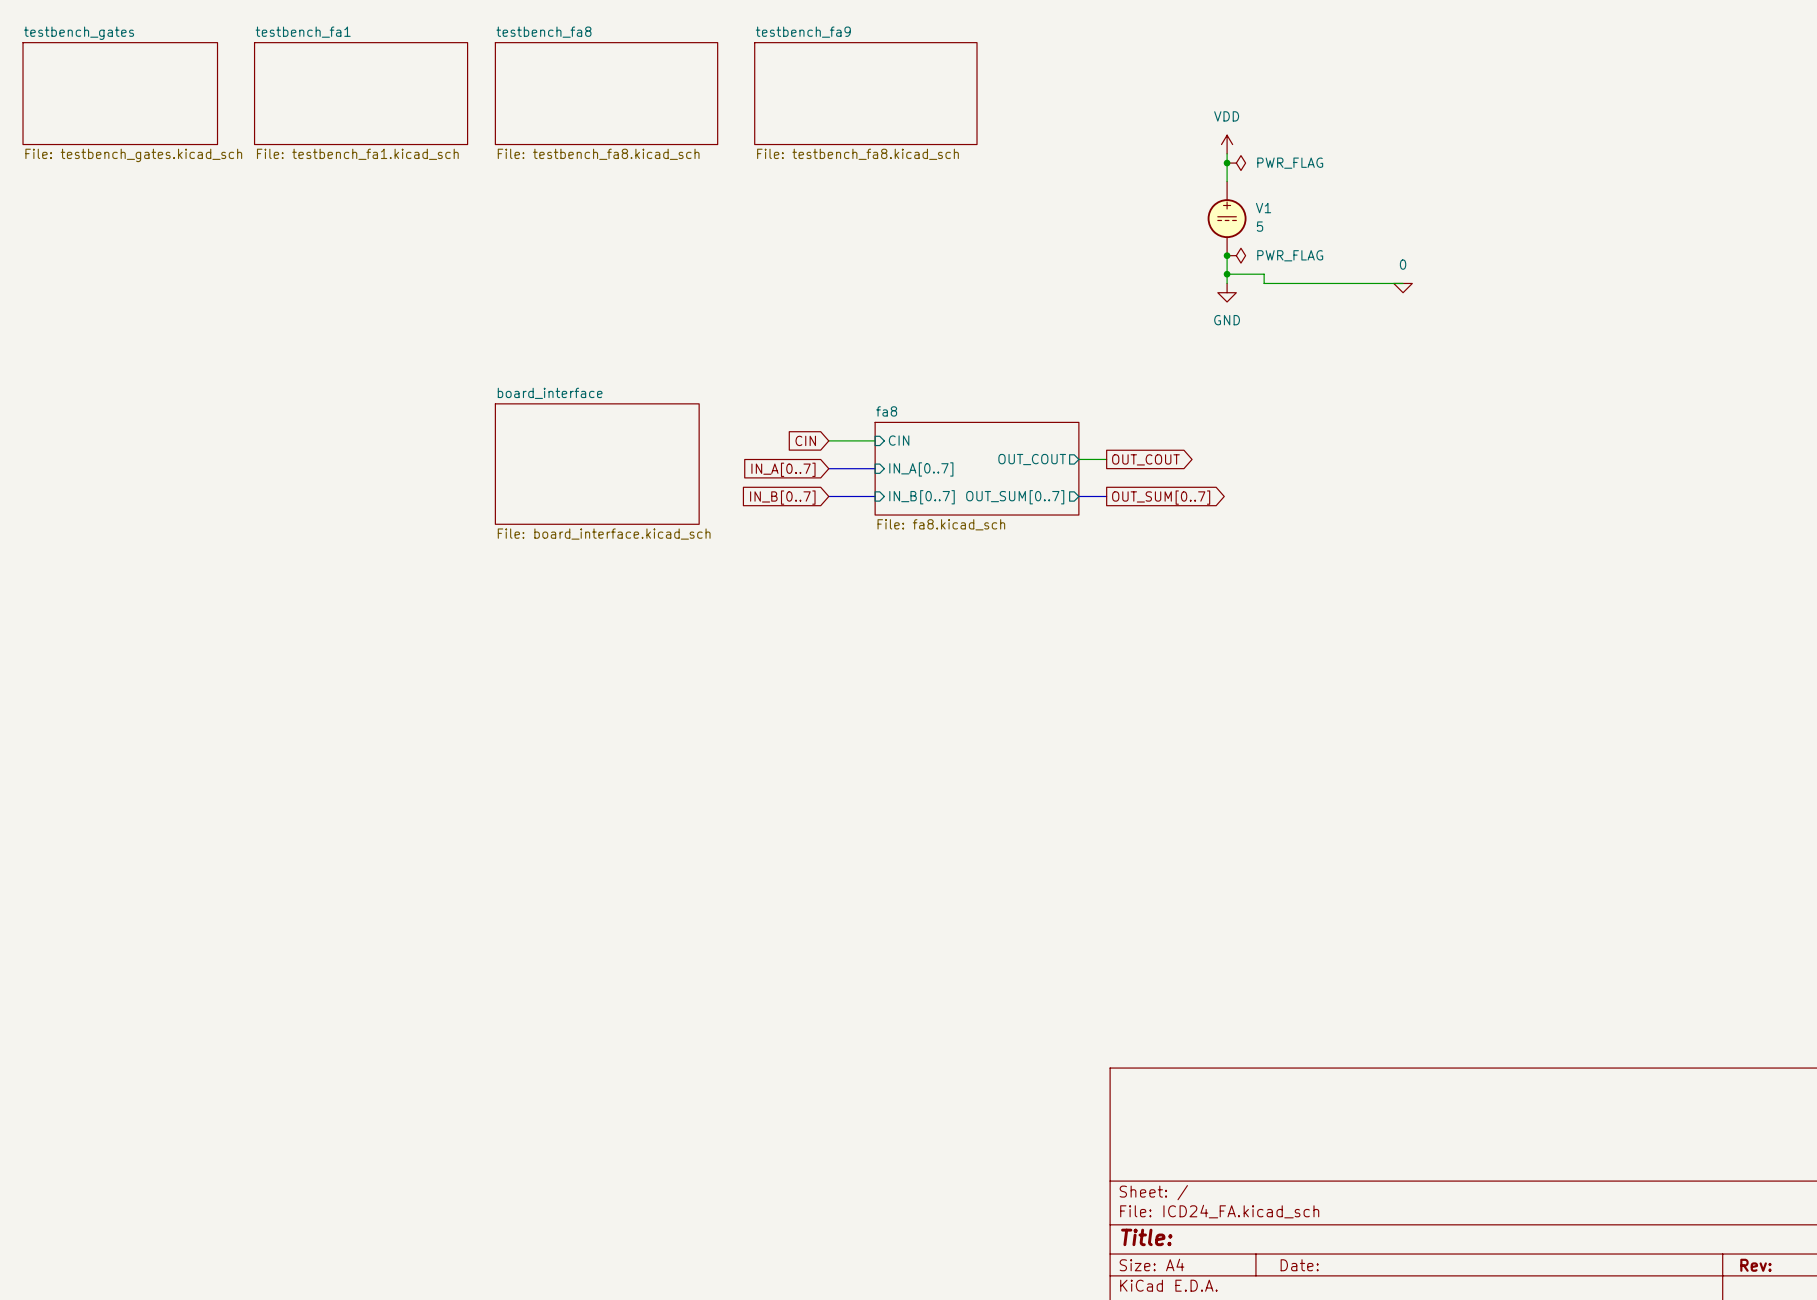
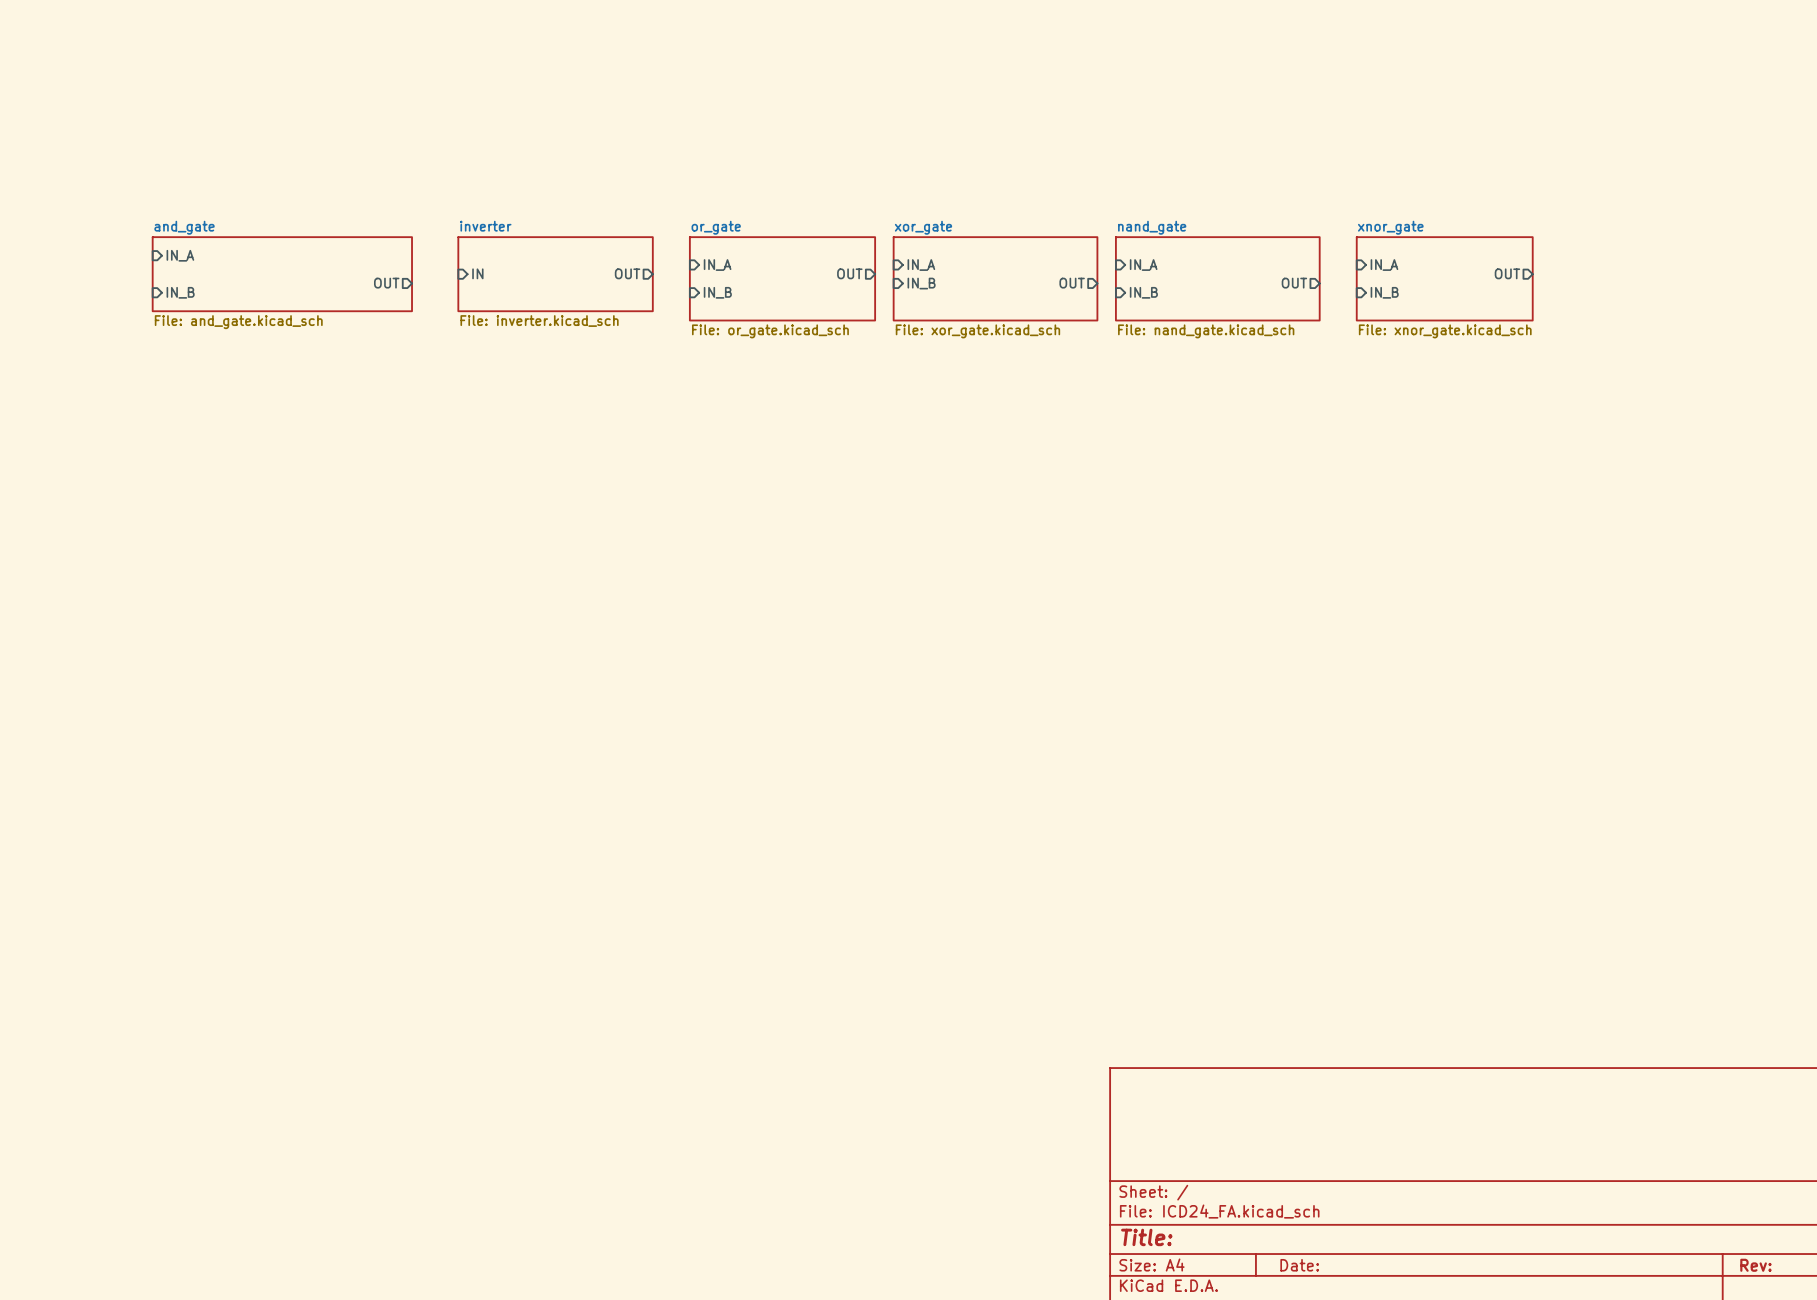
sheet testbench_gates: File: testbench_gates.kicad_sch (120, 93) -> none
sheet testbench_fa1: File: testbench_fa1.kicad_sch (361, 93) -> none
sheet testbench_fa8: File: testbench_fa8.kicad_sch (606, 93) -> none
sheet testbench_fa9: File: testbench_fa8.kicad_sch (865, 93) -> none
power symbol: VDD (1227, 144) -> none
wire: (1227, 153) (1227, 181) -> none
junction: (1227, 163) -> none
power symbol: PWR_FLAG (1236, 163) -> none
V1: 5 (1227, 218) -> none
sheet pin: none -> IN_A (180, 255)
wire: (1227, 255) (1227, 283) -> none
junction: (1227, 255) -> none
power symbol: PWR_FLAG (1236, 255) -> none
sheet pin: none -> IN_A (717, 265)
sheet pin: none -> IN_A (921, 265)
sheet pin: none -> IN_A (1143, 265)
sheet pin: none -> IN_A (1384, 265)
sheet pin: none -> IN (477, 273)
sheet pin: none -> OUT (627, 273)
sheet pin: none -> OUT (849, 273)
sheet pin: none -> OUT (1507, 273)
sheet and_gate: none -> File: and_gate.kicad_sch (282, 274)
sheet inverter: none -> File: inverter.kicad_sch (555, 274)
wire: (1227, 274) (1264, 274) (1264, 283) (1403, 283) -> none
junction: (1227, 274) -> none
sheet or_gate: none -> File: or_gate.kicad_sch (782, 278)
sheet xor_gate: none -> File: xor_gate.kicad_sch (995, 278)
sheet nand_gate: none -> File: nand_gate.kicad_sch (1217, 278)
sheet xnor_gate: none -> File: xnor_gate.kicad_sch (1444, 278)
sheet pin: none -> OUT (386, 283)
sheet pin: none -> IN_B (921, 283)
sheet pin: none -> OUT (1072, 283)
sheet pin: none -> OUT (1294, 283)
power symbol: 0 (1403, 288) -> none
sheet pin: none -> IN_B (180, 292)
sheet pin: none -> IN_B (717, 292)
sheet pin: none -> IN_B (1143, 292)
power symbol: GND (1227, 292) -> none
sheet pin: none -> IN_B (1384, 292)
global label: CIN (805, 440) -> none
wire: (828, 440) (875, 440) -> none
sheet pin: CIN (899, 440) -> none
sheet pin: OUT_COUT (1032, 459) -> none
wire: (1078, 459) (1106, 459) -> none
global label: OUT_COUT (1145, 459) -> none
sheet board_interface: File: board_interface.kicad_sch (597, 464) -> none
bus: (828, 468) (875, 468) -> none
sheet fa8: File: fa8.kicad_sch (977, 468) -> none
global label: IN_A[0..7] (783, 469) -> none
sheet pin: IN_A[0..7] (921, 469) -> none
bus: (828, 496) (875, 496) -> none
bus: (1078, 496) (1106, 496) -> none
global label: IN_B[0..7] (782, 497) -> none
sheet pin: IN_B[0..7] (922, 497) -> none
sheet pin: OUT_SUM[0..7] (1015, 497) -> none
global label: OUT_SUM[0..7] (1161, 497) -> none

